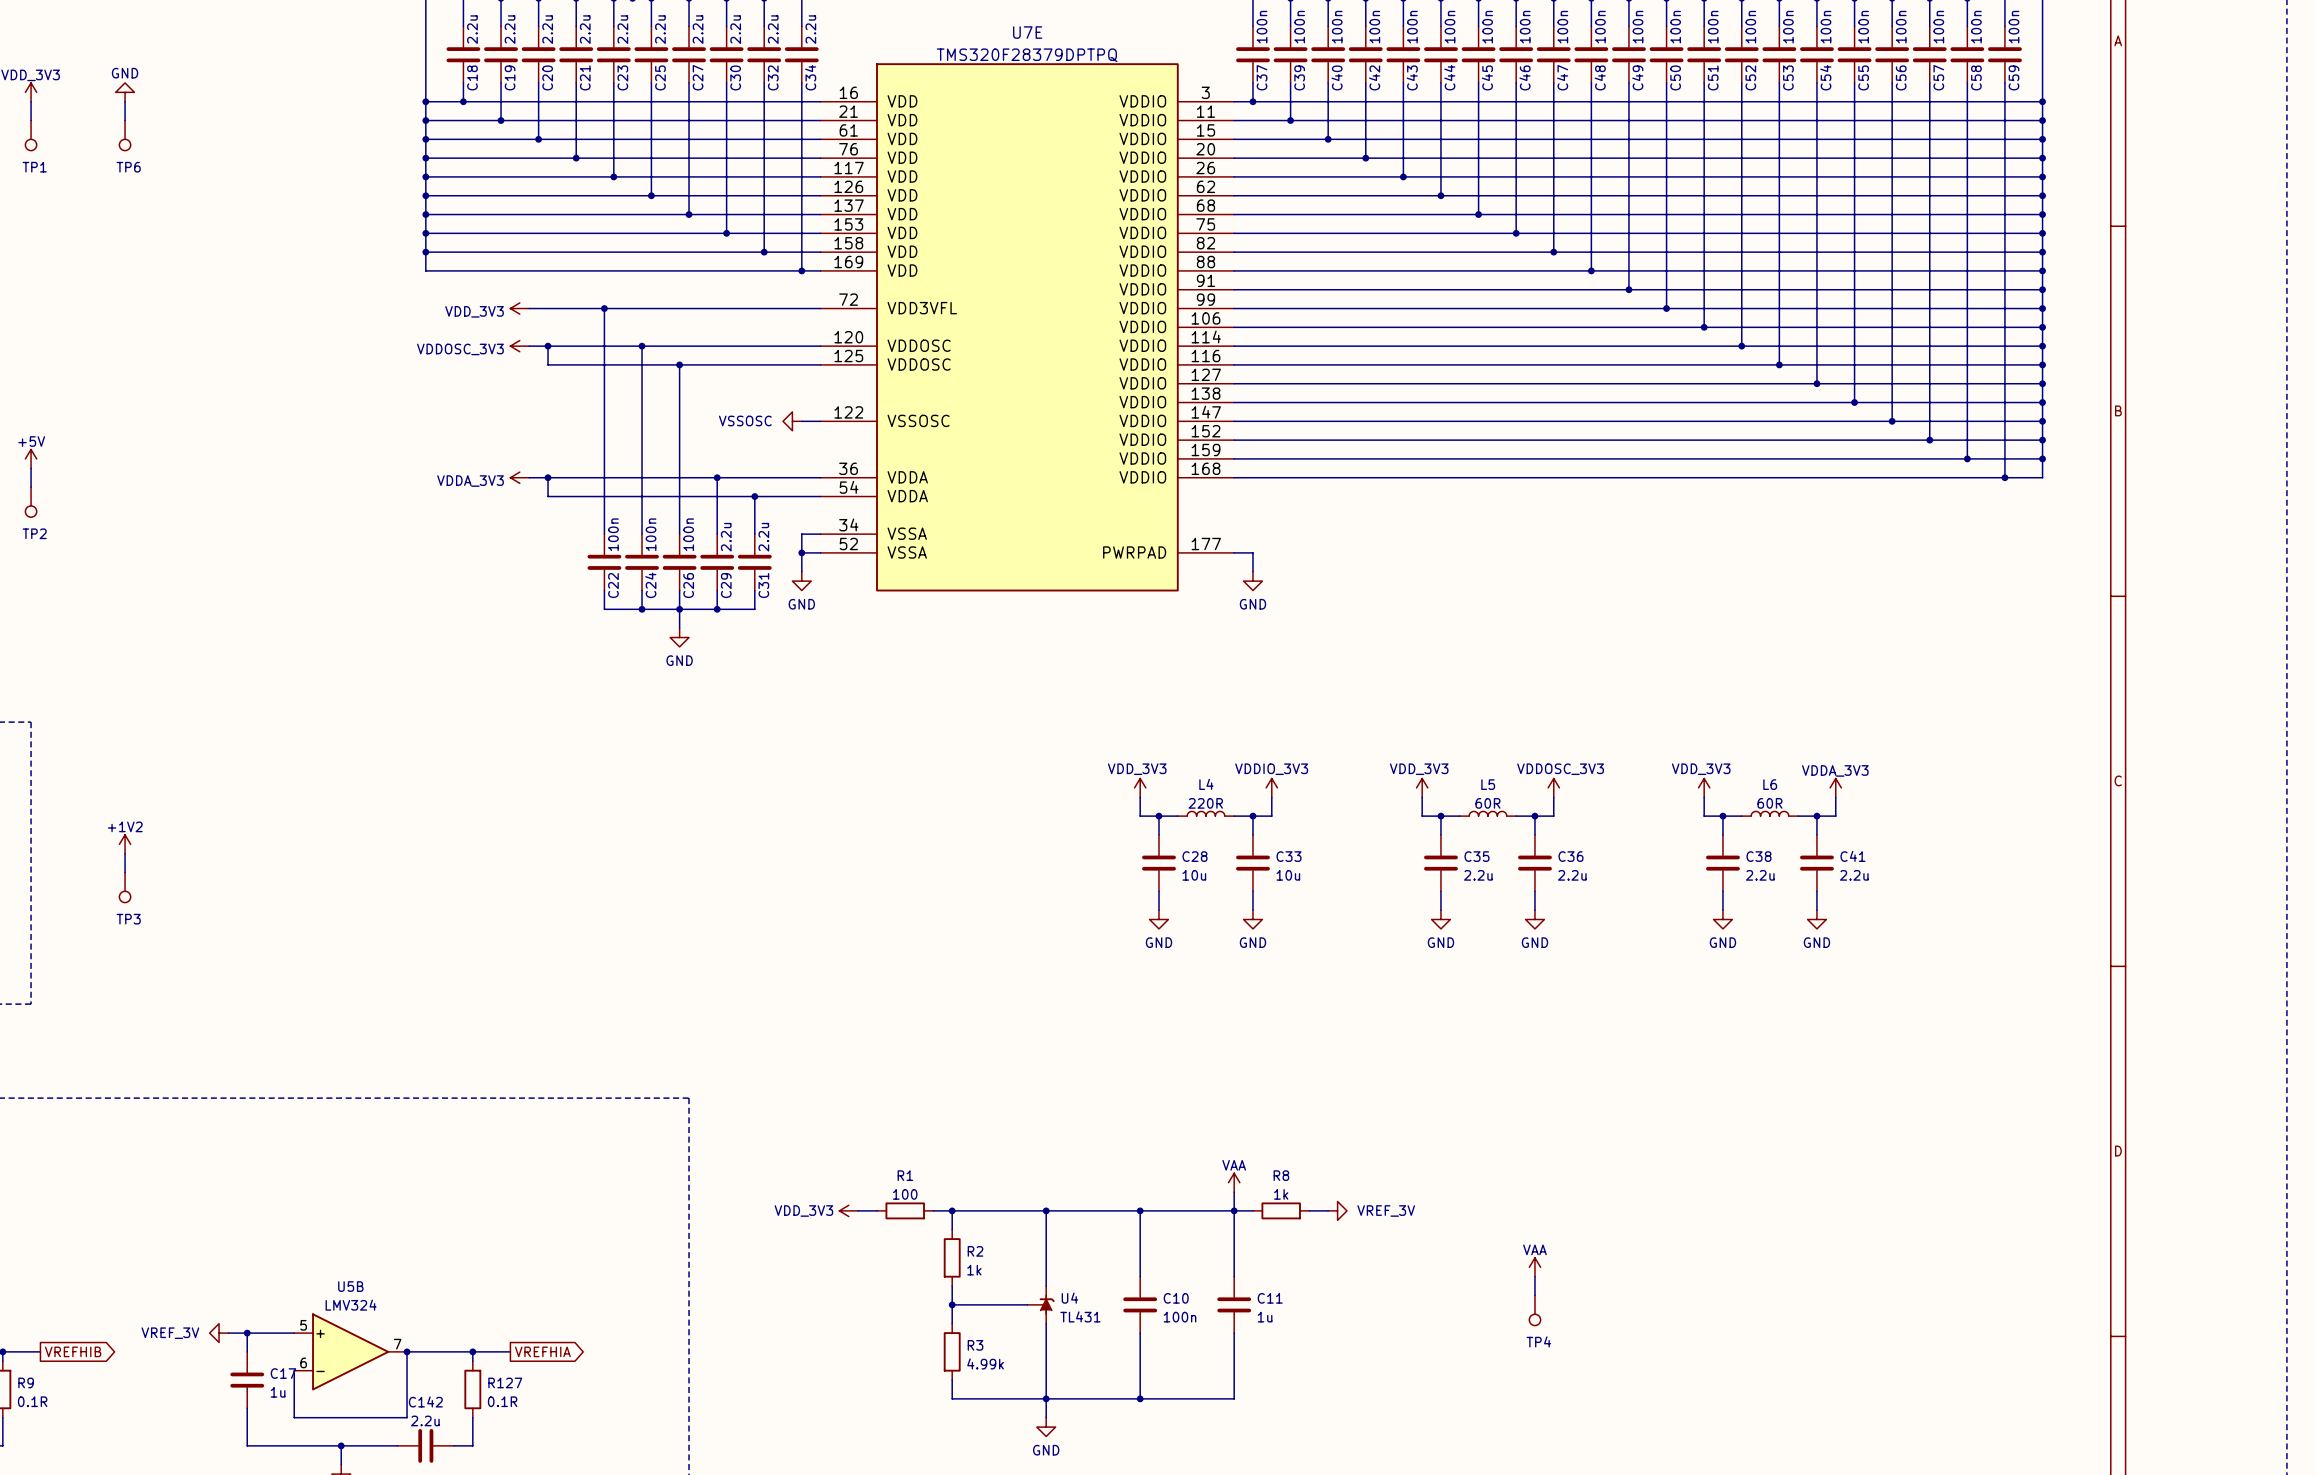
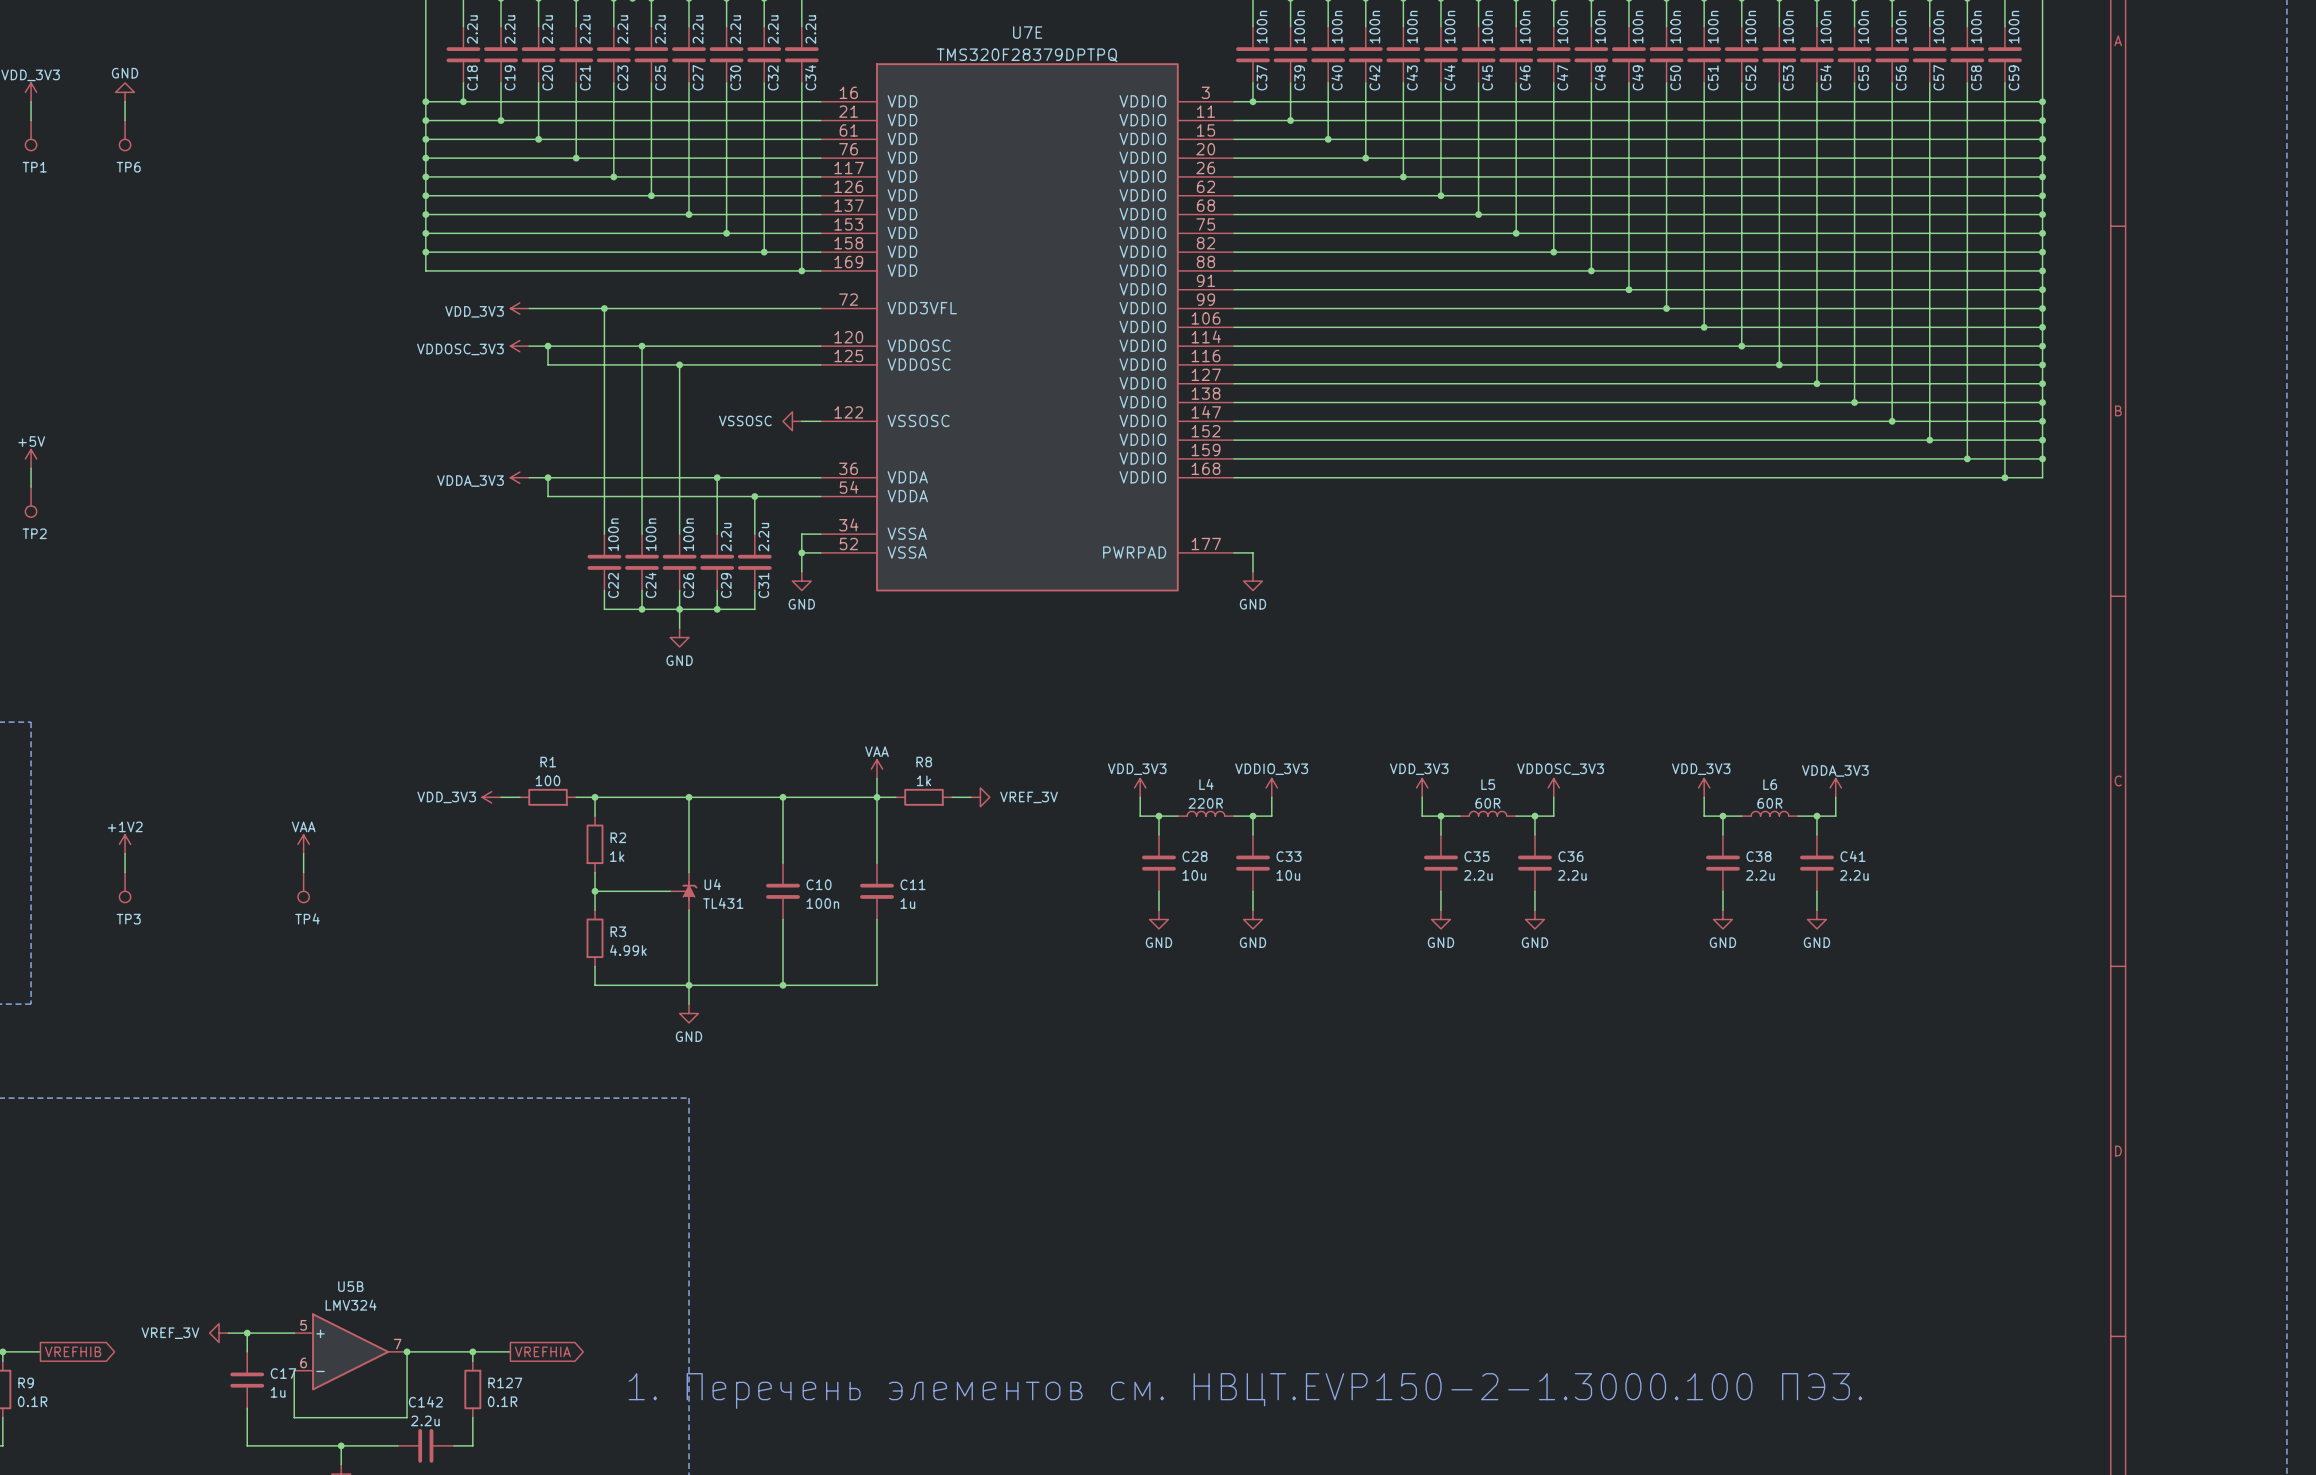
power symbol: none -> VAA (877, 769)
wire: none -> (877, 778) (877, 863)
power symbol: none -> VDD_3V3 (491, 797)
wire: none -> (501, 797) (519, 797)
wire: none -> (576, 797) (895, 797)
wire: none -> (595, 797) (595, 816)
junction: none -> (595, 797)
wire: none -> (689, 797) (689, 872)
junction: none -> (689, 797)
wire: none -> (783, 797) (783, 863)
junction: none -> (783, 797)
junction: none -> (877, 797)
wire: none -> (952, 797) (971, 797)
power symbol: none -> VREF_3V (980, 797)
power symbol: none -> VAA (303, 844)
wire: none -> (303, 853) (303, 872)
wire: none -> (595, 872) (595, 910)
wire: none -> (595, 891) (670, 891)
junction: none -> (595, 891)
wire: none -> (689, 910) (689, 1004)
wire: none -> (783, 919) (783, 985)
wire: none -> (877, 919) (877, 985) (595, 985) (595, 966)
junction: none -> (689, 985)
junction: none -> (783, 985)
power symbol: none -> GND (689, 1013)
power symbol: VAA (1234, 1182) -> none
wire: (1234, 1192) (1234, 1276) -> none
power symbol: VDD_3V3 (848, 1210) -> none
wire: (858, 1210) (877, 1210) -> none
R1 position: (905, 1210) -> (548, 797)
wire: (933, 1210) (1252, 1210) -> none
wire: (952, 1210) (952, 1229) -> none
junction: (952, 1210) -> none
wire: (1046, 1210) (1046, 1286) -> none
junction: (1046, 1210) -> none
wire: (1140, 1210) (1140, 1276) -> none
junction: (1140, 1210) -> none
junction: (1234, 1210) -> none
R8 position: (1281, 1210) -> (924, 797)
wire: (1309, 1210) (1328, 1210) -> none
power symbol: VREF_3V (1337, 1210) -> none
R2 position: (952, 1257) -> (595, 844)
power symbol: VAA (1534, 1267) -> none
wire: (1534, 1276) (1534, 1295) -> none
wire: (952, 1286) (952, 1323) -> none
wire: (952, 1304) (1027, 1304) -> none
junction: (952, 1304) -> none
U4 position: (1041, 1304) -> (683, 891)
C10 position: (1140, 1304) -> (783, 891)
C11 position: (1234, 1304) -> (877, 891)
TP4 position: (1534, 1310) -> (303, 887)
wire: (1046, 1323) (1046, 1417) -> none
wire: (1140, 1333) (1140, 1398) -> none
wire: (1234, 1333) (1234, 1398) (952, 1398) (952, 1380) -> none
R3 position: (952, 1351) -> (595, 938)
text: none -> 1. Перечень элементов см. НВЦТ.EVP150-2-1.3000.100 ПЭ3. (1245, 1390)
junction: (1046, 1398) -> none
junction: (1140, 1398) -> none
power symbol: GND (1046, 1427) -> none

